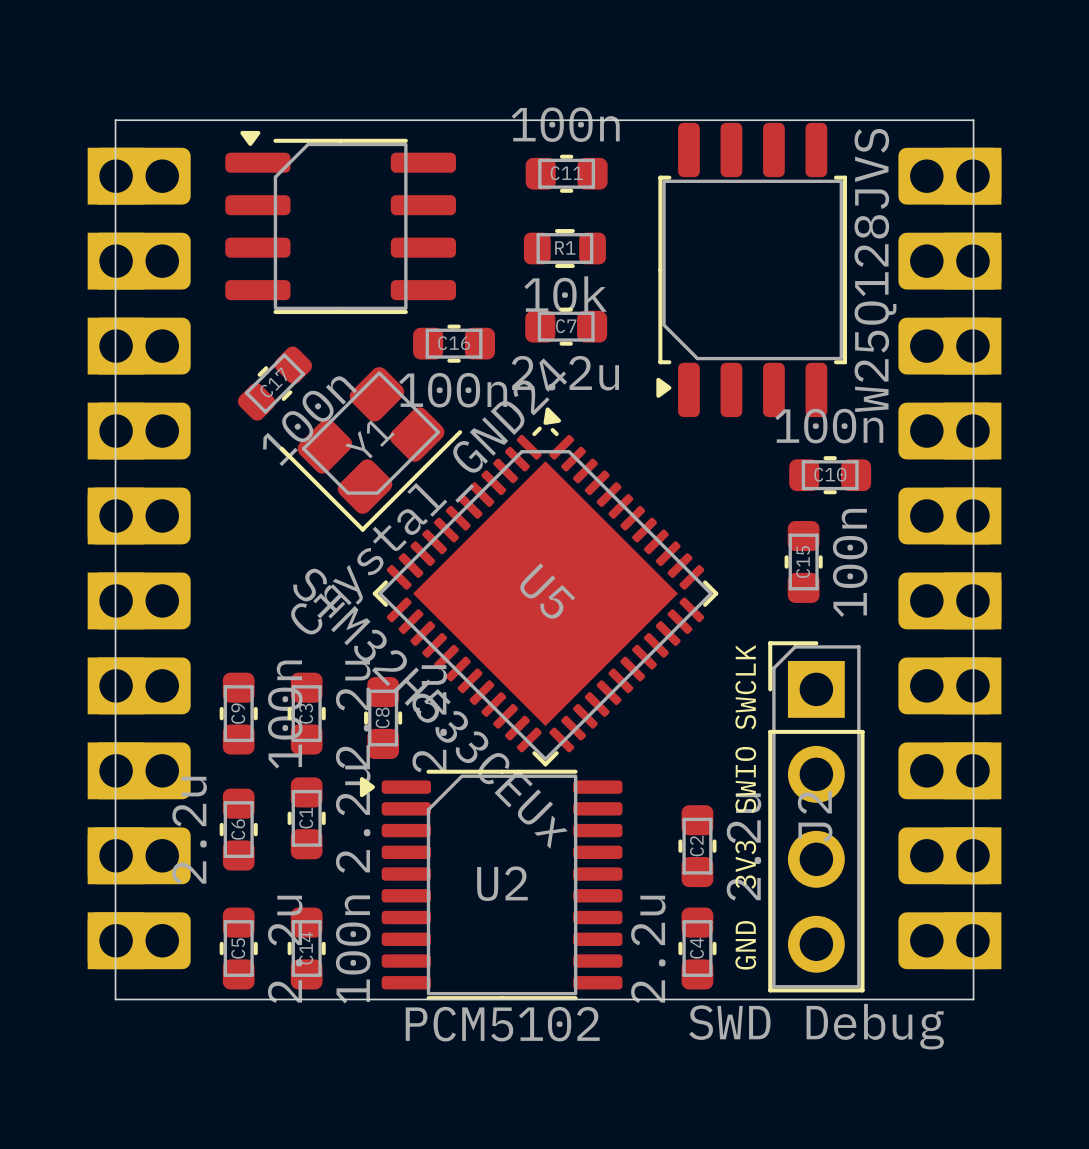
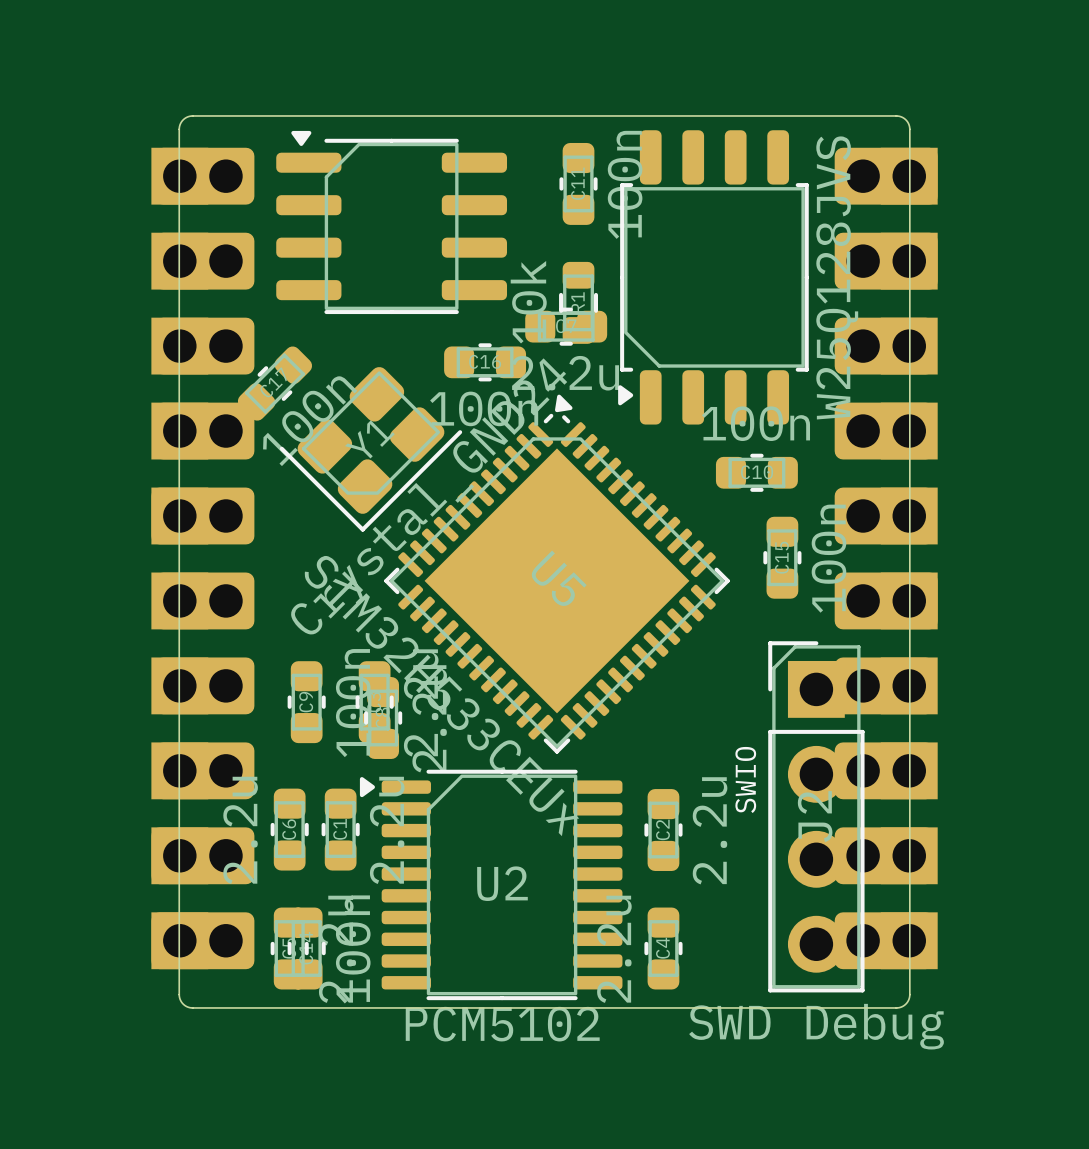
board edge: (115, 120) (973, 120) (973, 999) (115, 999) (115, 120) -> (192, 115) (183, 119) (179, 129) (179, 994) (182, 1002) (192, 1007) (896, 1007) (904, 1005) (909, 994) (909, 129) (906, 121) (896, 115) (192, 115)
C11 rotation: 0° (566, 173) -> 90° clockwise (578, 183)
part position: (340, 222) -> (391, 222)
R1 rotation: 0° (564, 248) -> 90° clockwise (578, 302)
R1 position: (564, 248) -> (578, 302)
part position: (751, 269) -> (713, 277)
C16 position: (454, 343) -> (485, 362)
C10 position: (830, 475) -> (756, 472)
part position: (139, 558) -> (202, 558)
part position: (949, 558) -> (886, 558)
C15 position: (803, 561) -> (782, 557)
U5 position: (545, 586) -> (557, 574)
text: SWCLK (745, 687) -> none
C9 position: (238, 713) -> (306, 702)
C3 position: (306, 713) -> (374, 702)
C1 position: (306, 818) -> (340, 829)
C6 position: (238, 829) -> (289, 829)
C2 position: (697, 846) -> (663, 830)
text: 3V3 (745, 864) -> none
text: GND (745, 945) -> none
C5 position: (238, 948) -> (289, 948)
C4 position: (697, 948) -> (663, 948)

